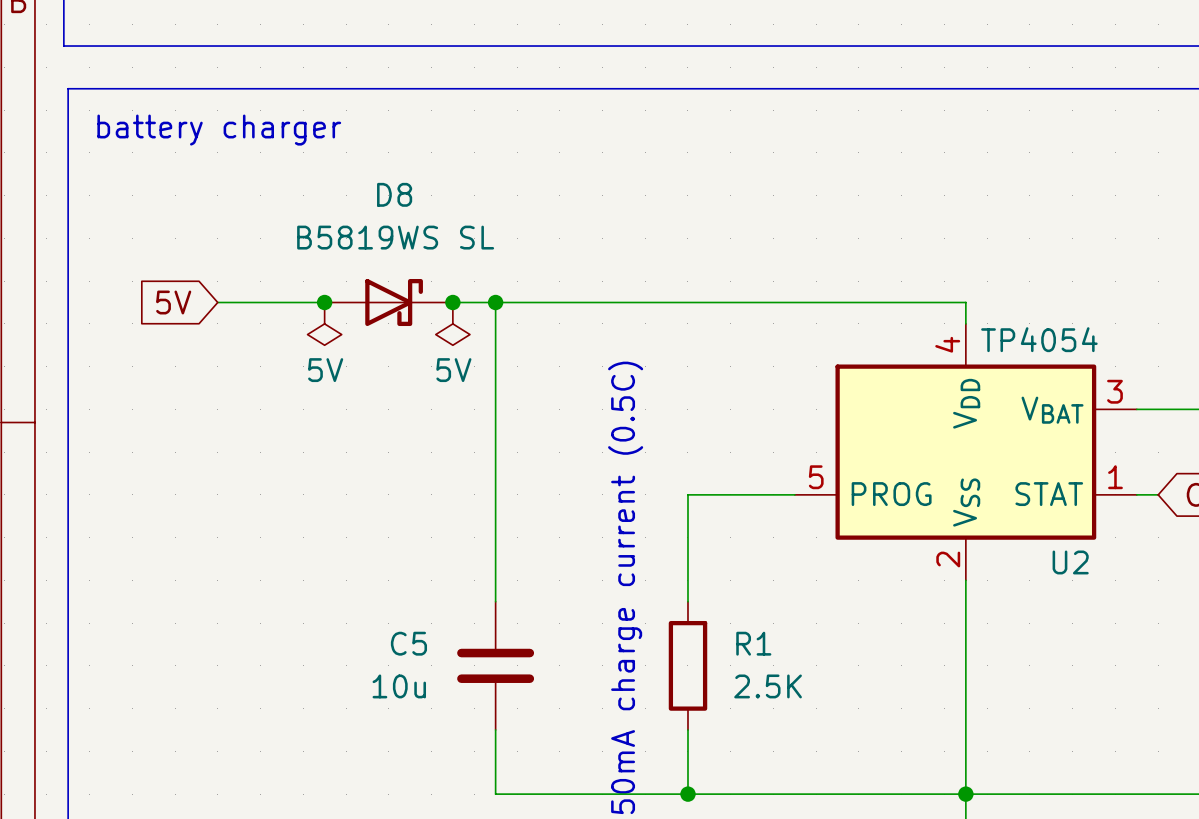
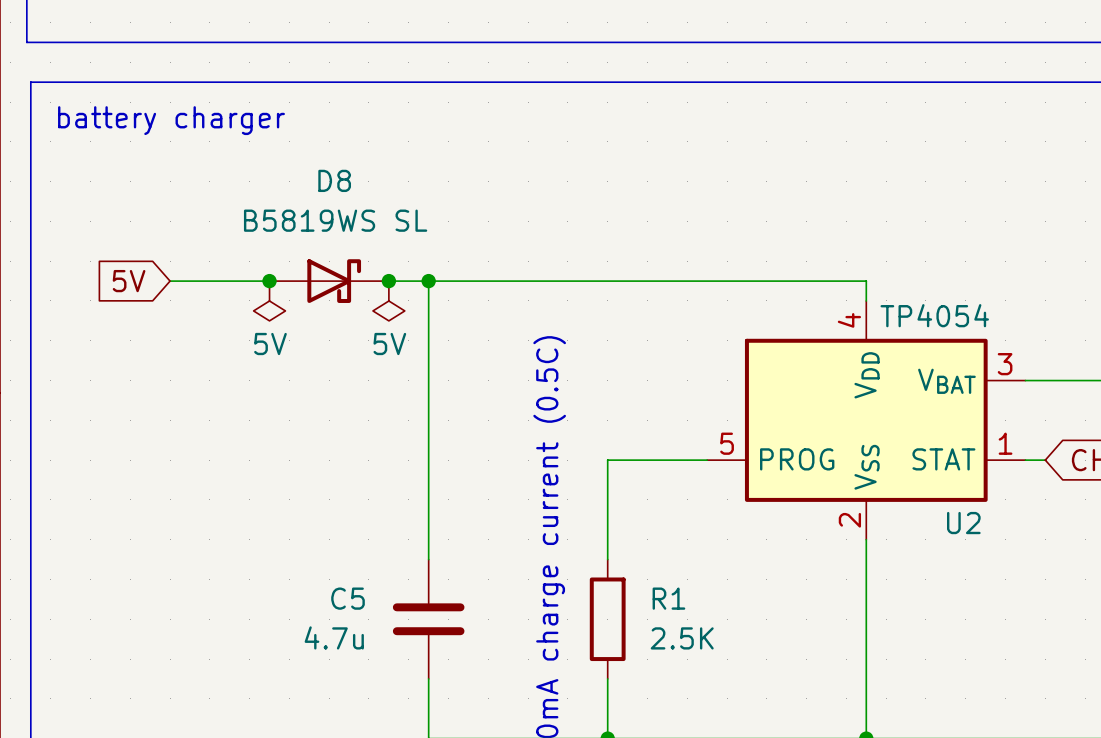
C5 value: 10u (399, 686) -> 4.7u (334, 637)

